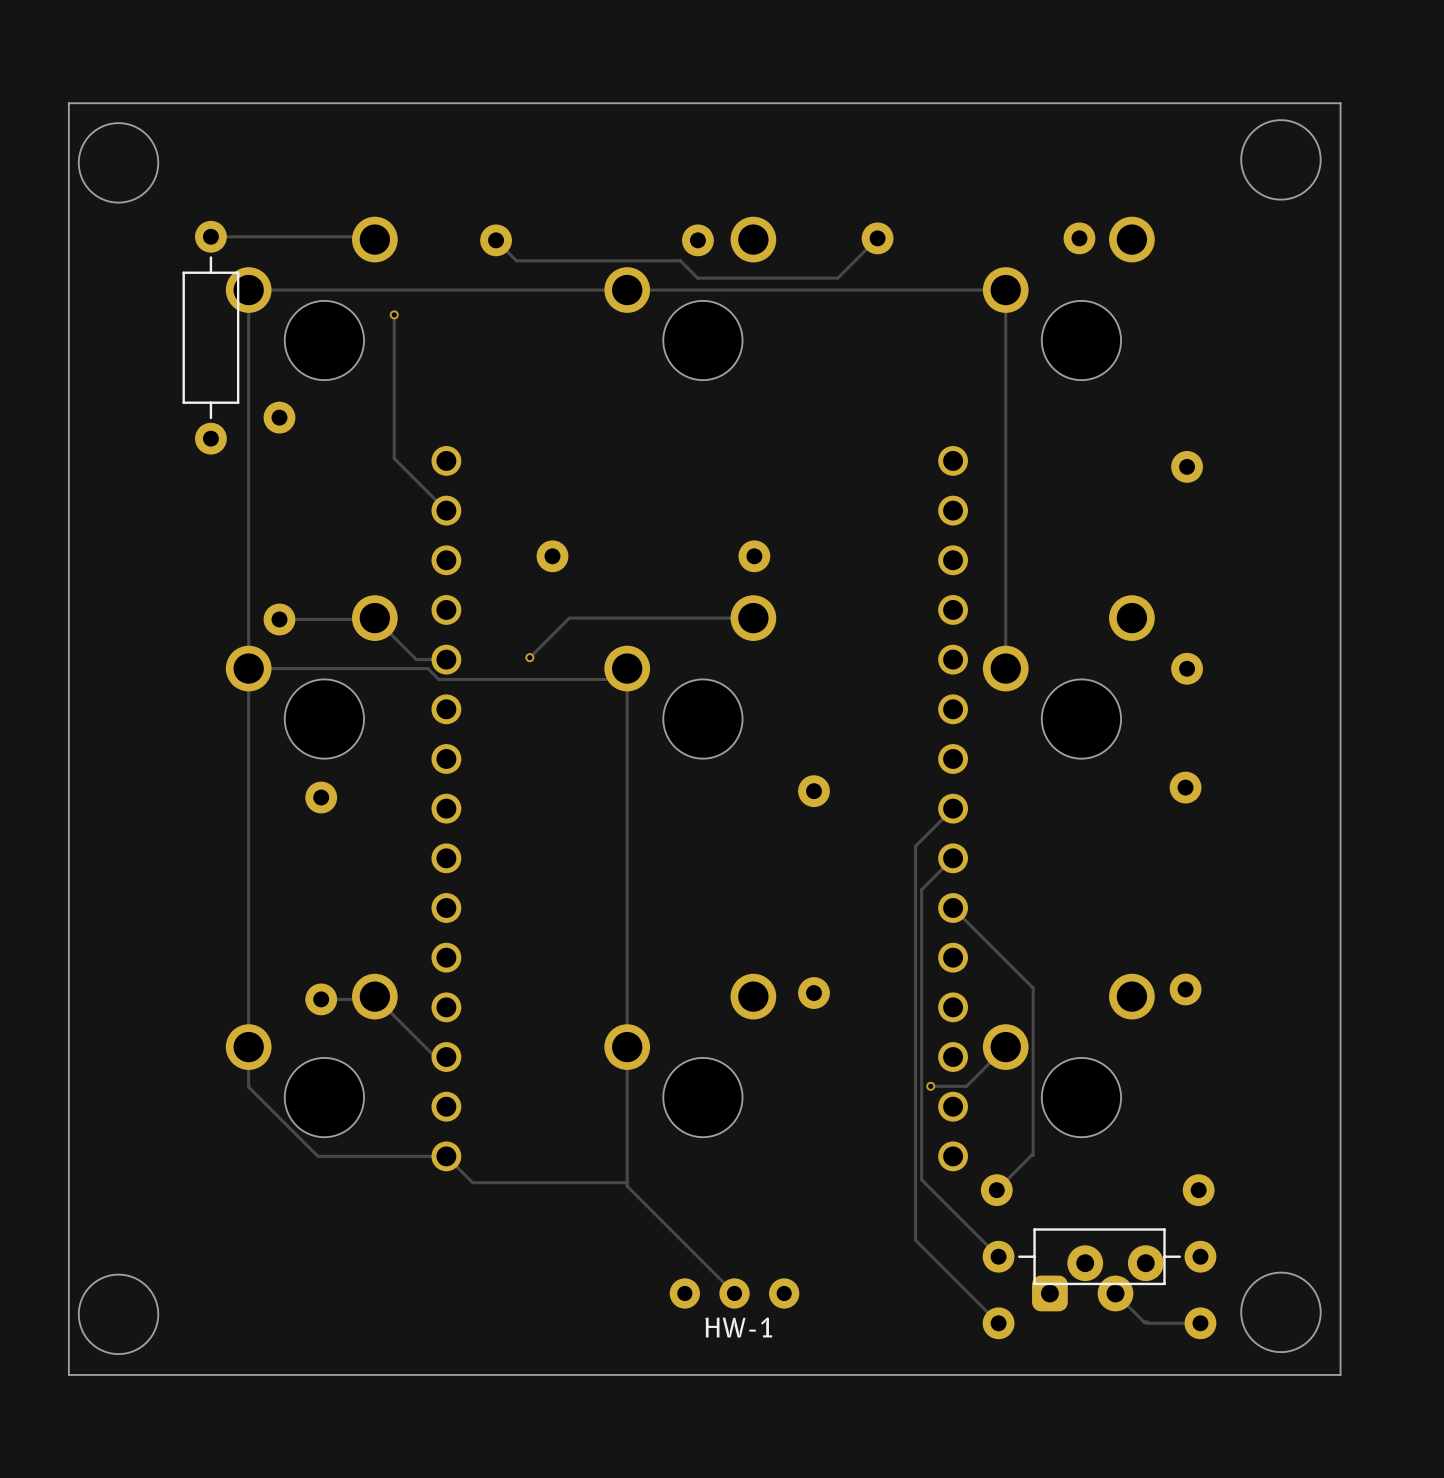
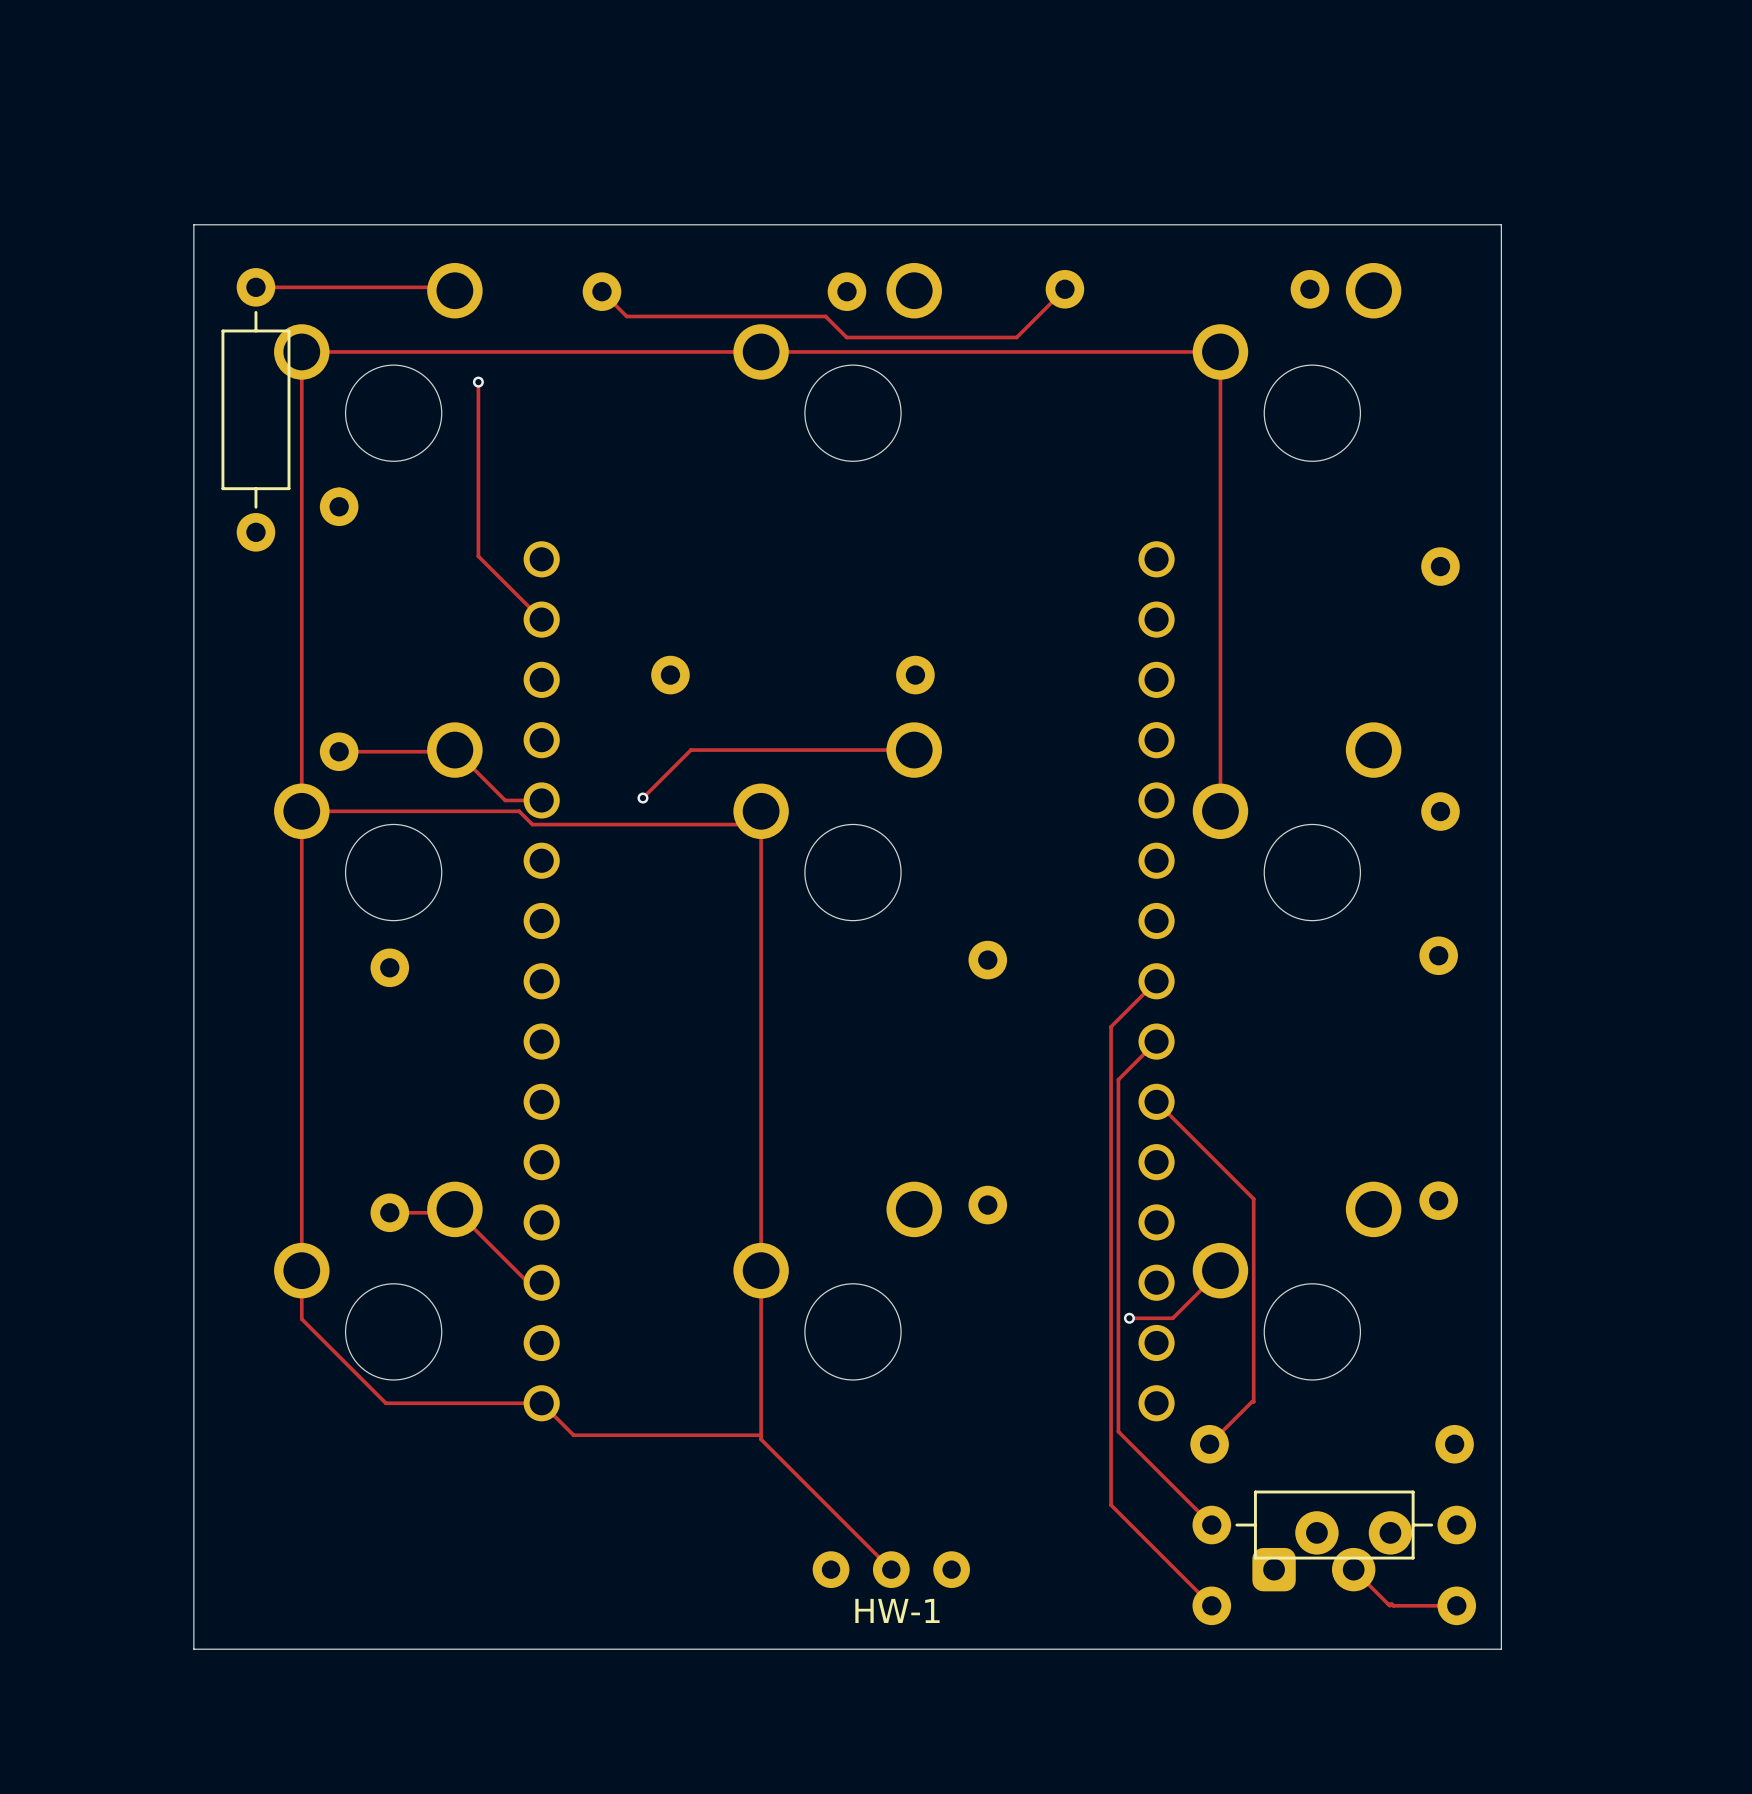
board edge: (68, 103) (1340, 103) (1340, 1374) (68, 1374) (68, 103) -> (193, 224) (193, 1649) (1501, 1649) (1501, 224) (193, 224)
round board edge: [1240, 119, 1322, 201] -> none
round board edge: [78, 122, 159, 203] -> none
round board edge: [1240, 1272, 1322, 1353] -> none
round board edge: [78, 1274, 159, 1355] -> none

